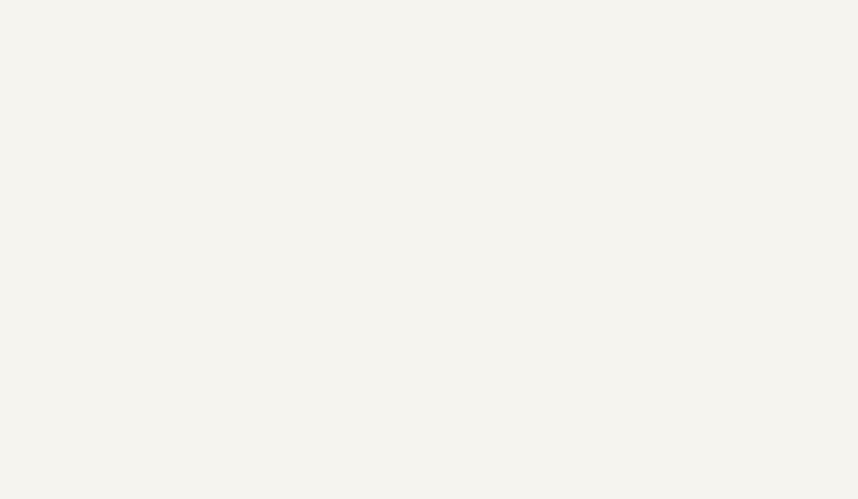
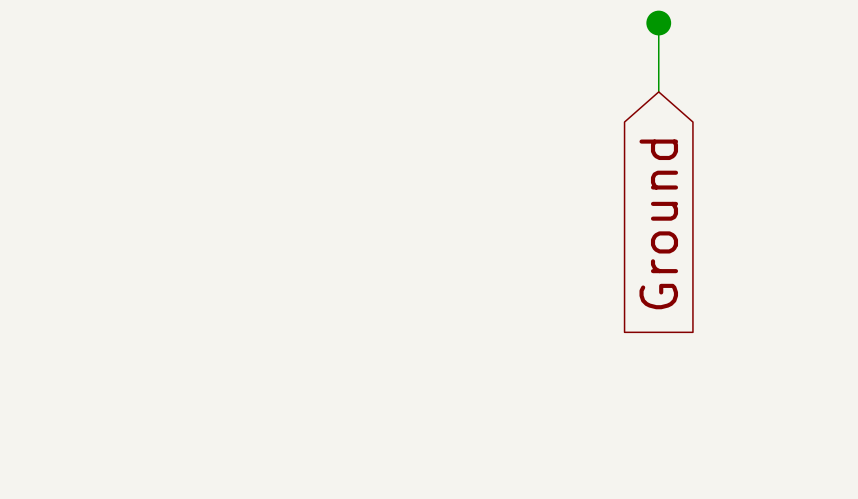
wire: none -> (658, 23) (658, 91)
junction: none -> (658, 23)
global label: none -> Ground (658, 224)

